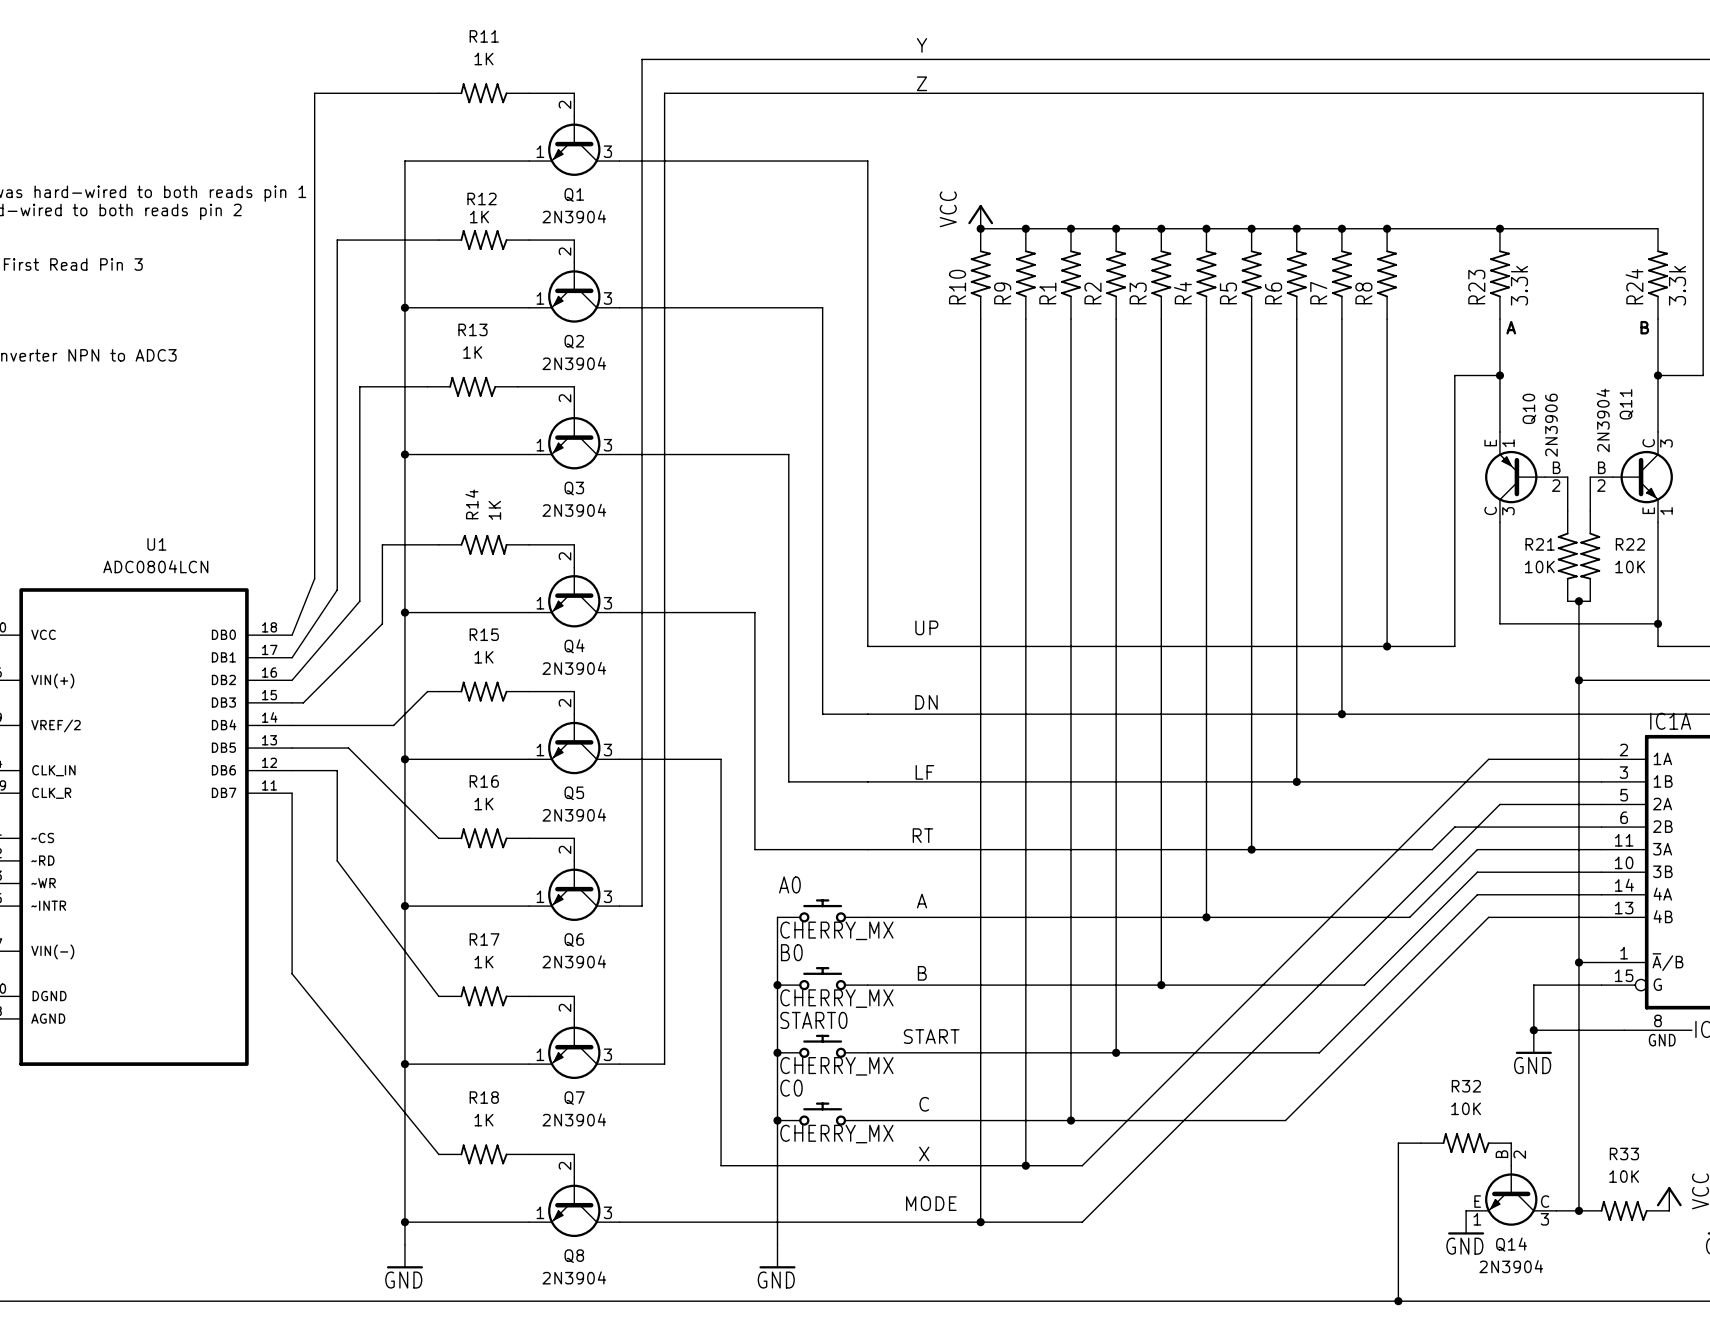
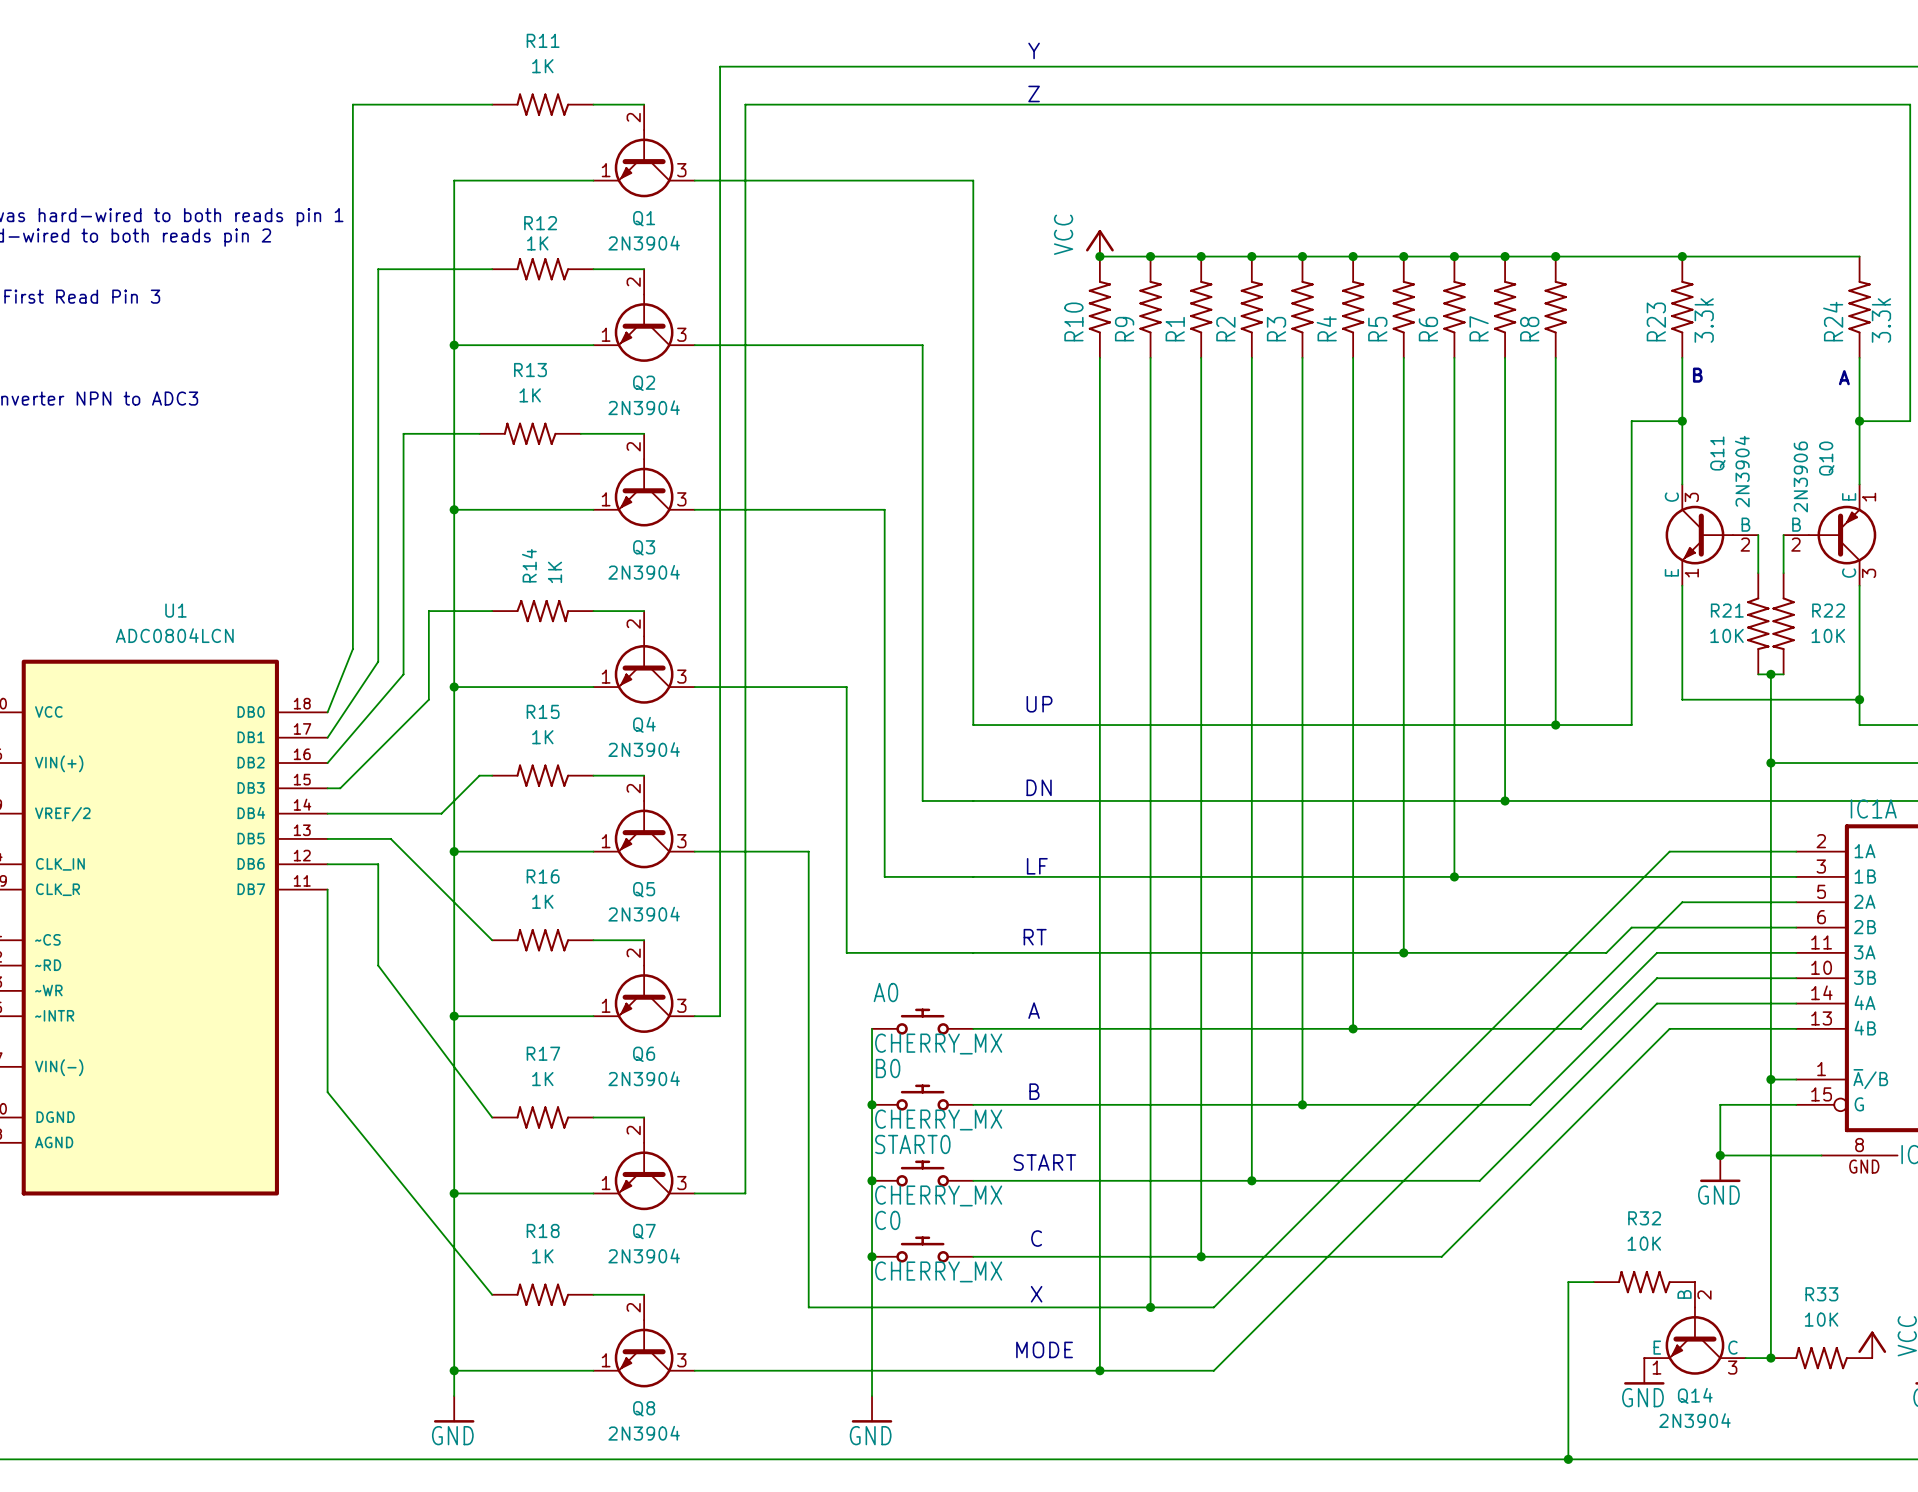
text position: A (1511, 327) -> A (1844, 377)
text position: B (1644, 327) -> B (1697, 375)
Q10 flip: as is (1515, 477) -> left-right (1842, 535)
Q10 position: (1526, 477) -> (1829, 535)
Q11 position: (1631, 477) -> (1711, 535)
Q11 flip: as is (1642, 477) -> left-right (1699, 535)

